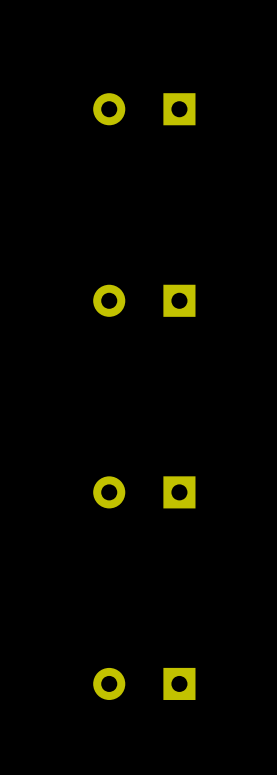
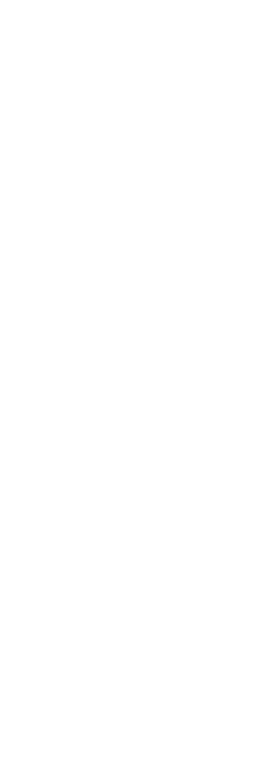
part: (144, 109) -> none
part: (144, 300) -> none
part: (144, 492) -> none
part: (144, 683) -> none

